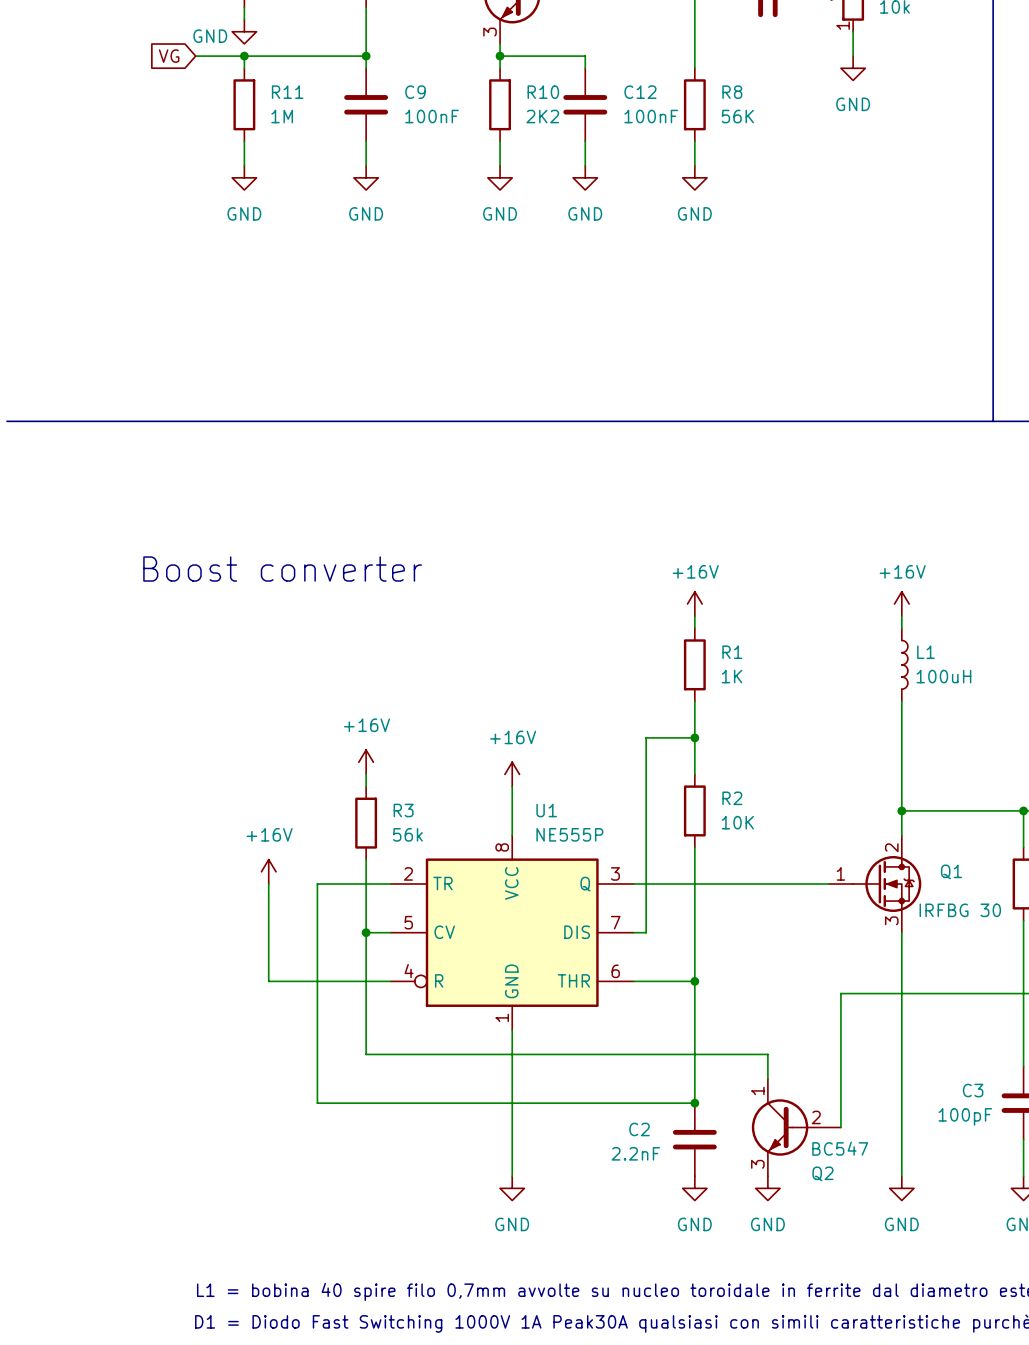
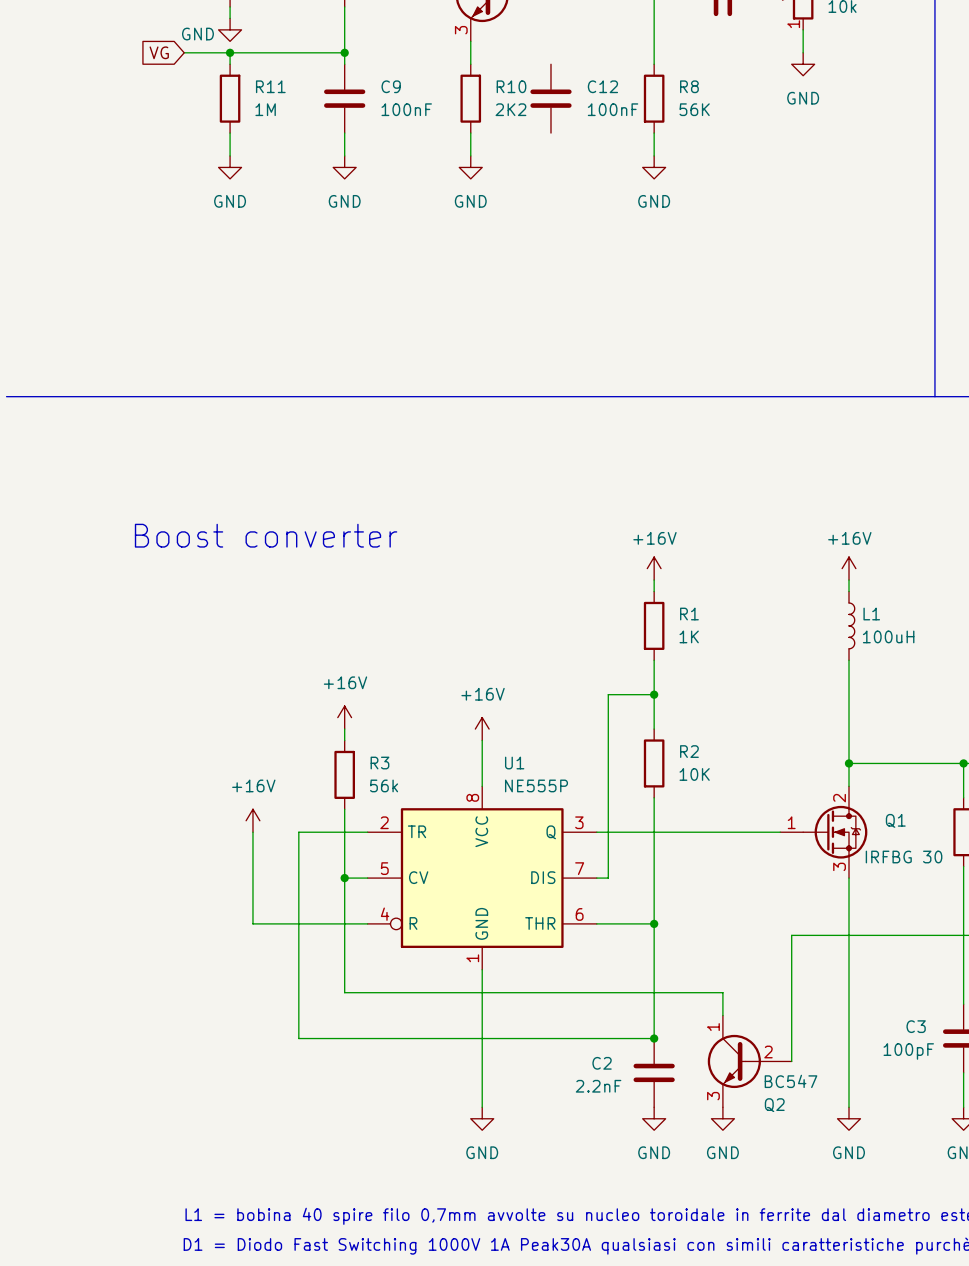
wire: (500, 56) (585, 56) (585, 68) -> none
junction: (500, 56) -> none
wire: (585, 141) (585, 165) -> none
power symbol: GND (585, 177) -> none

